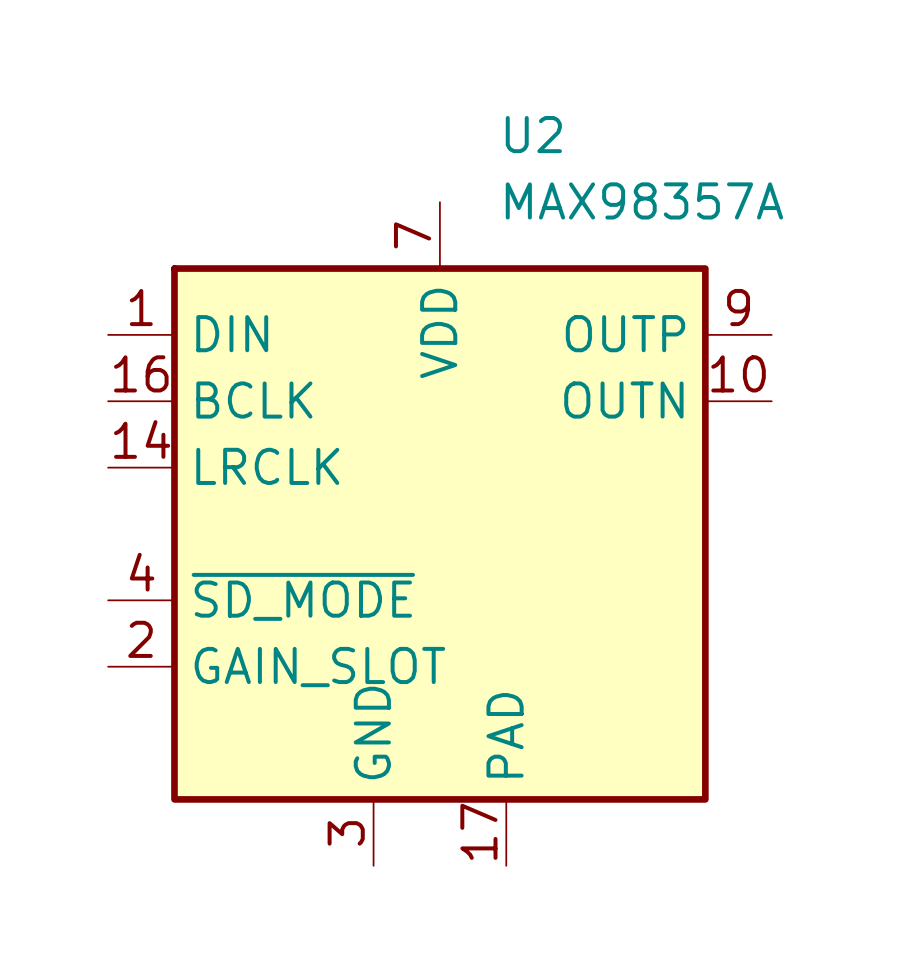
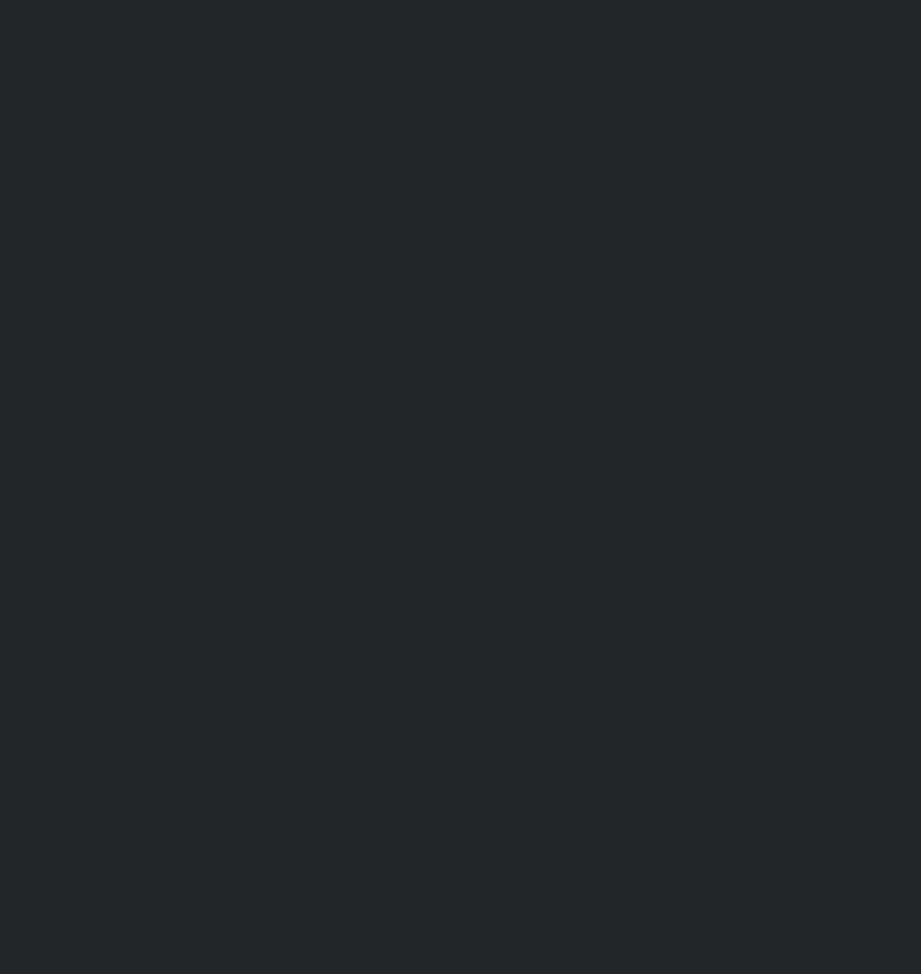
U2: MAX98357A (439, 533) -> none

